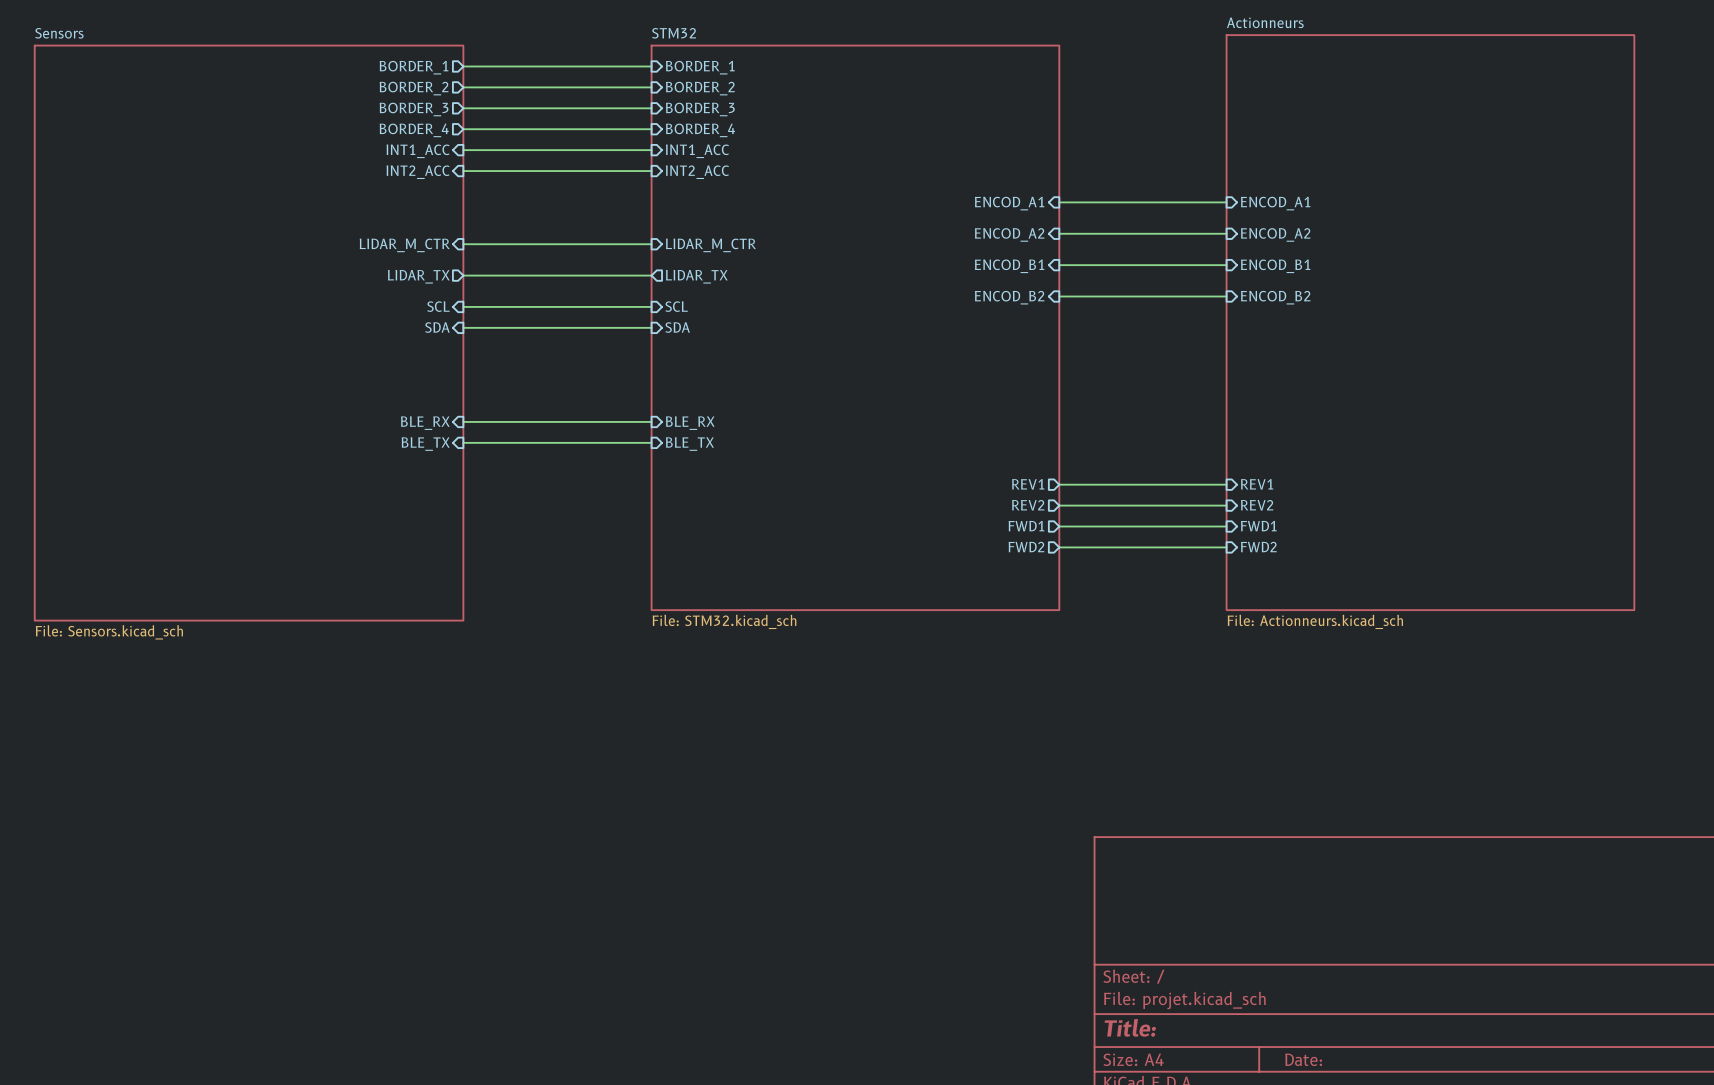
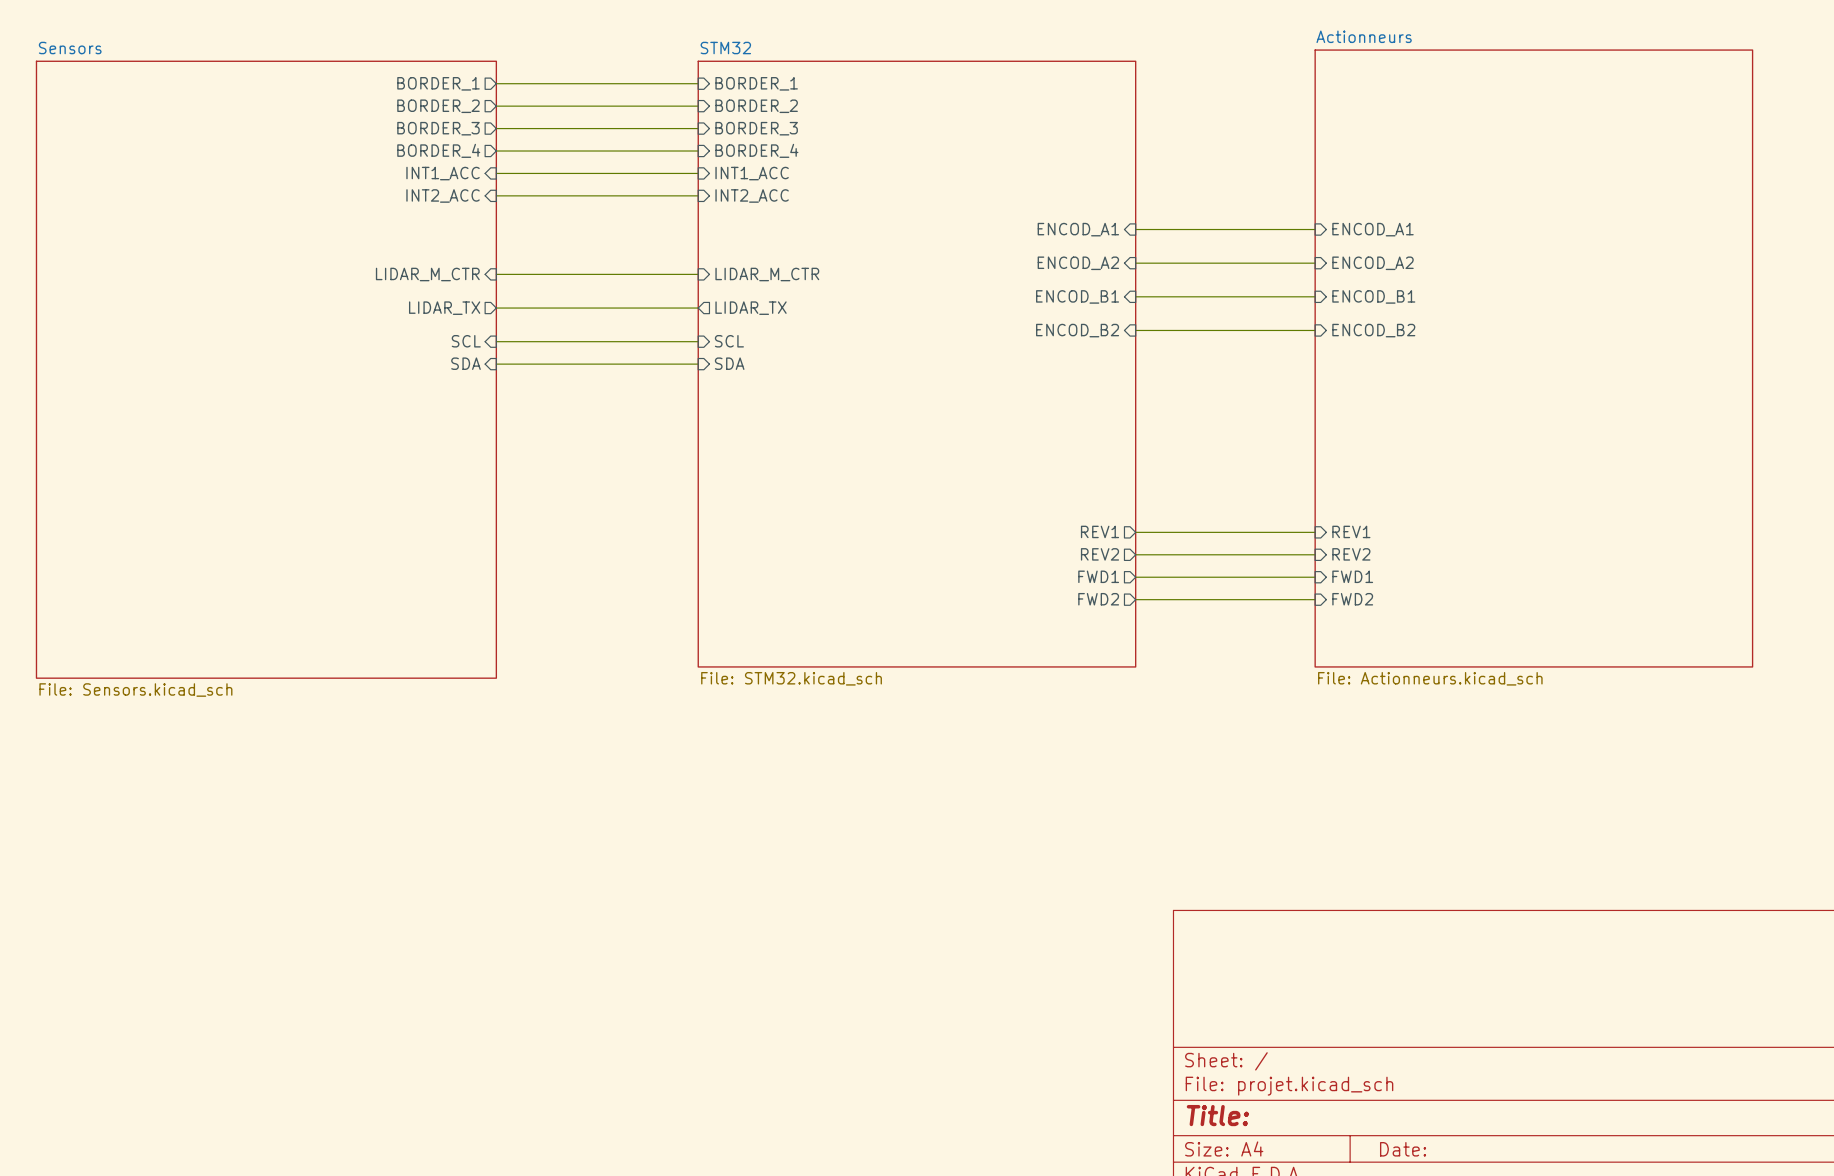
wire: (463, 421) (651, 421) -> none
sheet pin: BLE_RX (425, 423) -> none
sheet pin: BLE_RX (690, 423) -> none
wire: (463, 442) (651, 442) -> none
sheet pin: BLE_TX (425, 444) -> none
sheet pin: BLE_TX (689, 444) -> none

